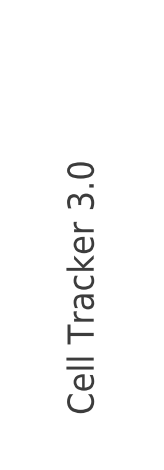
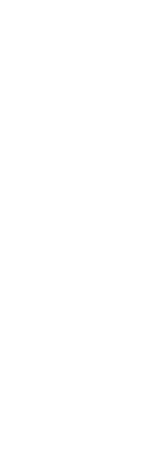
text: Cell Tracker 3.0 (80, 287) -> none

